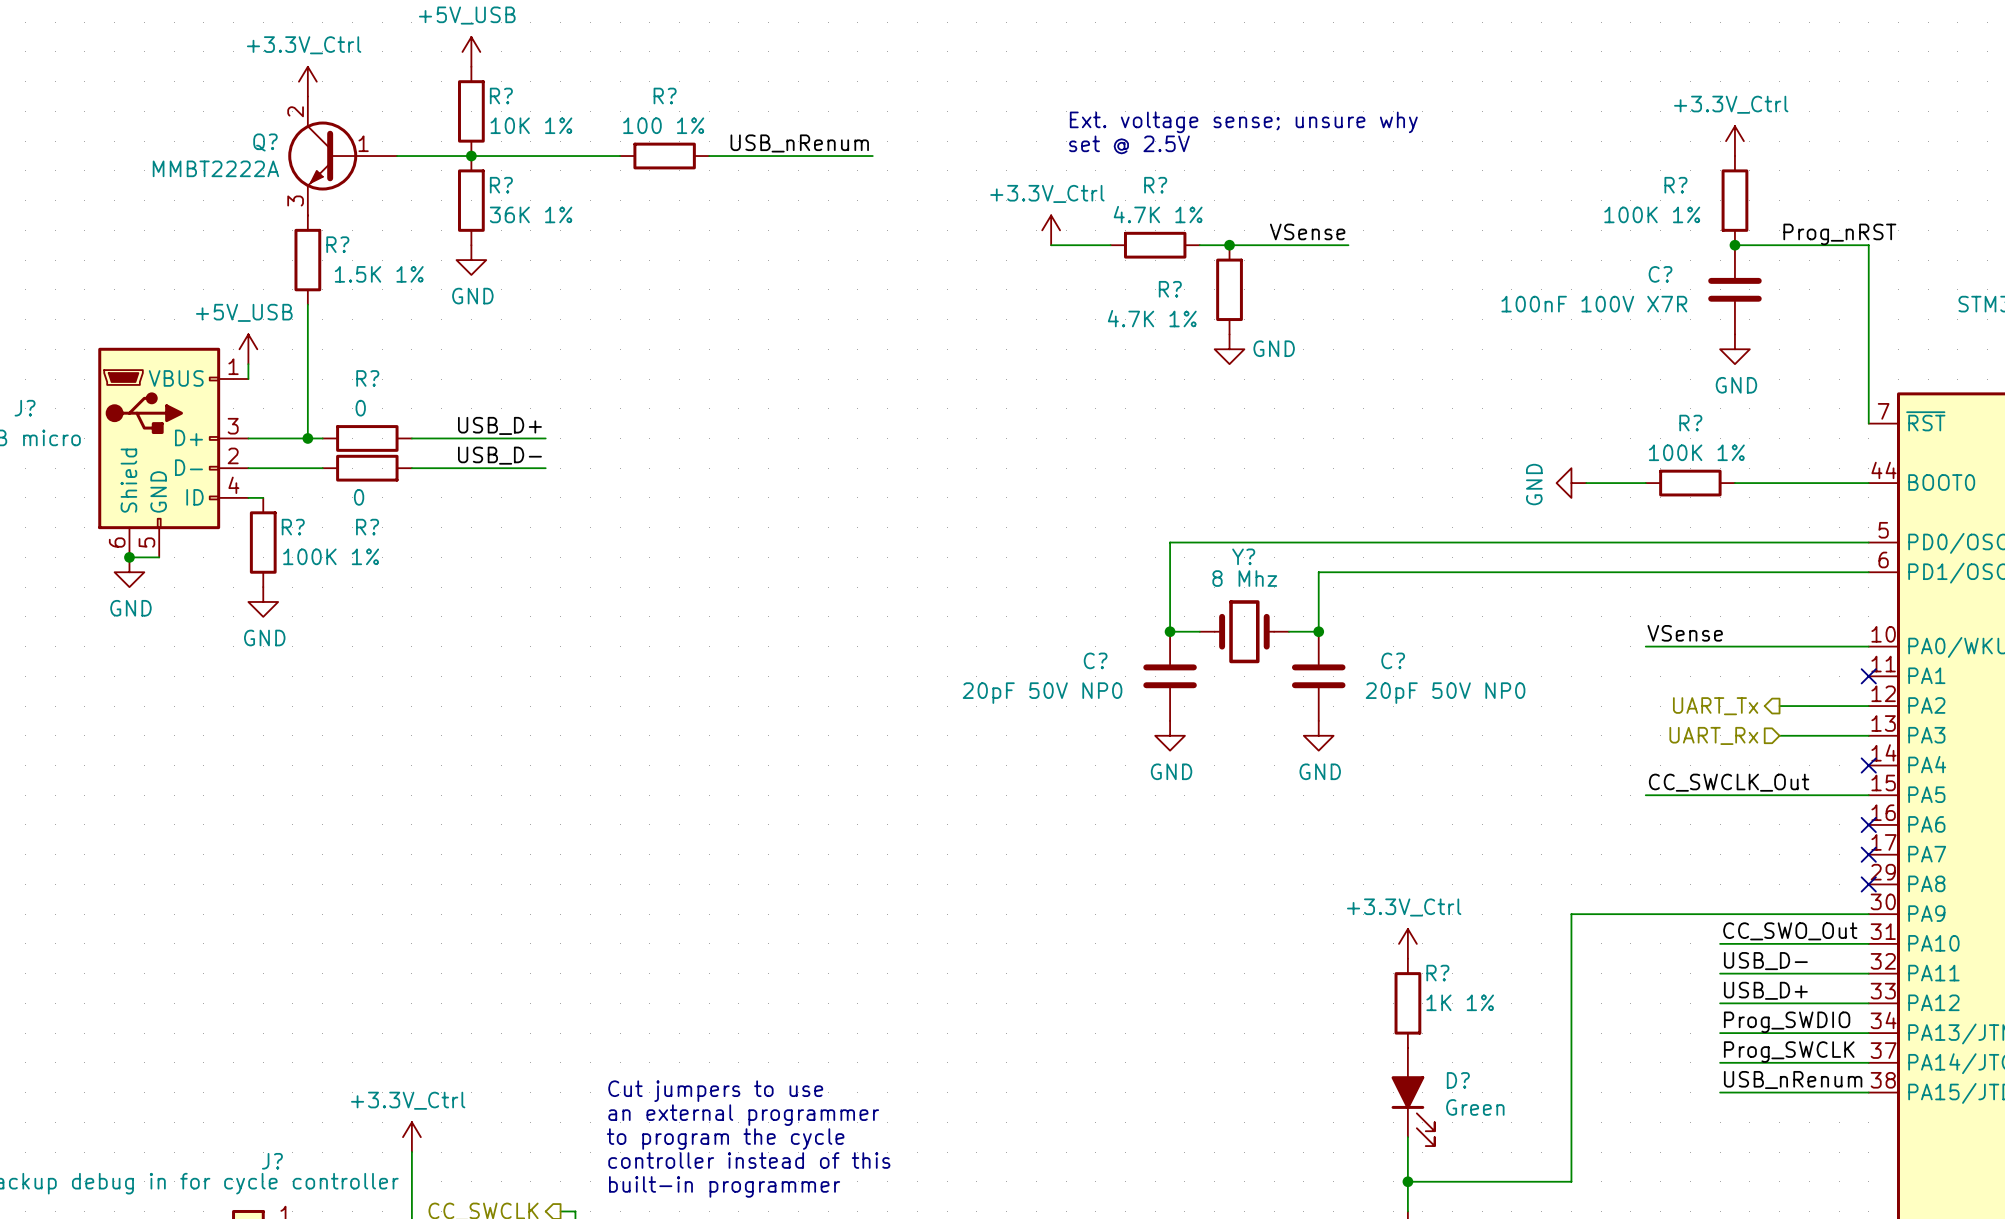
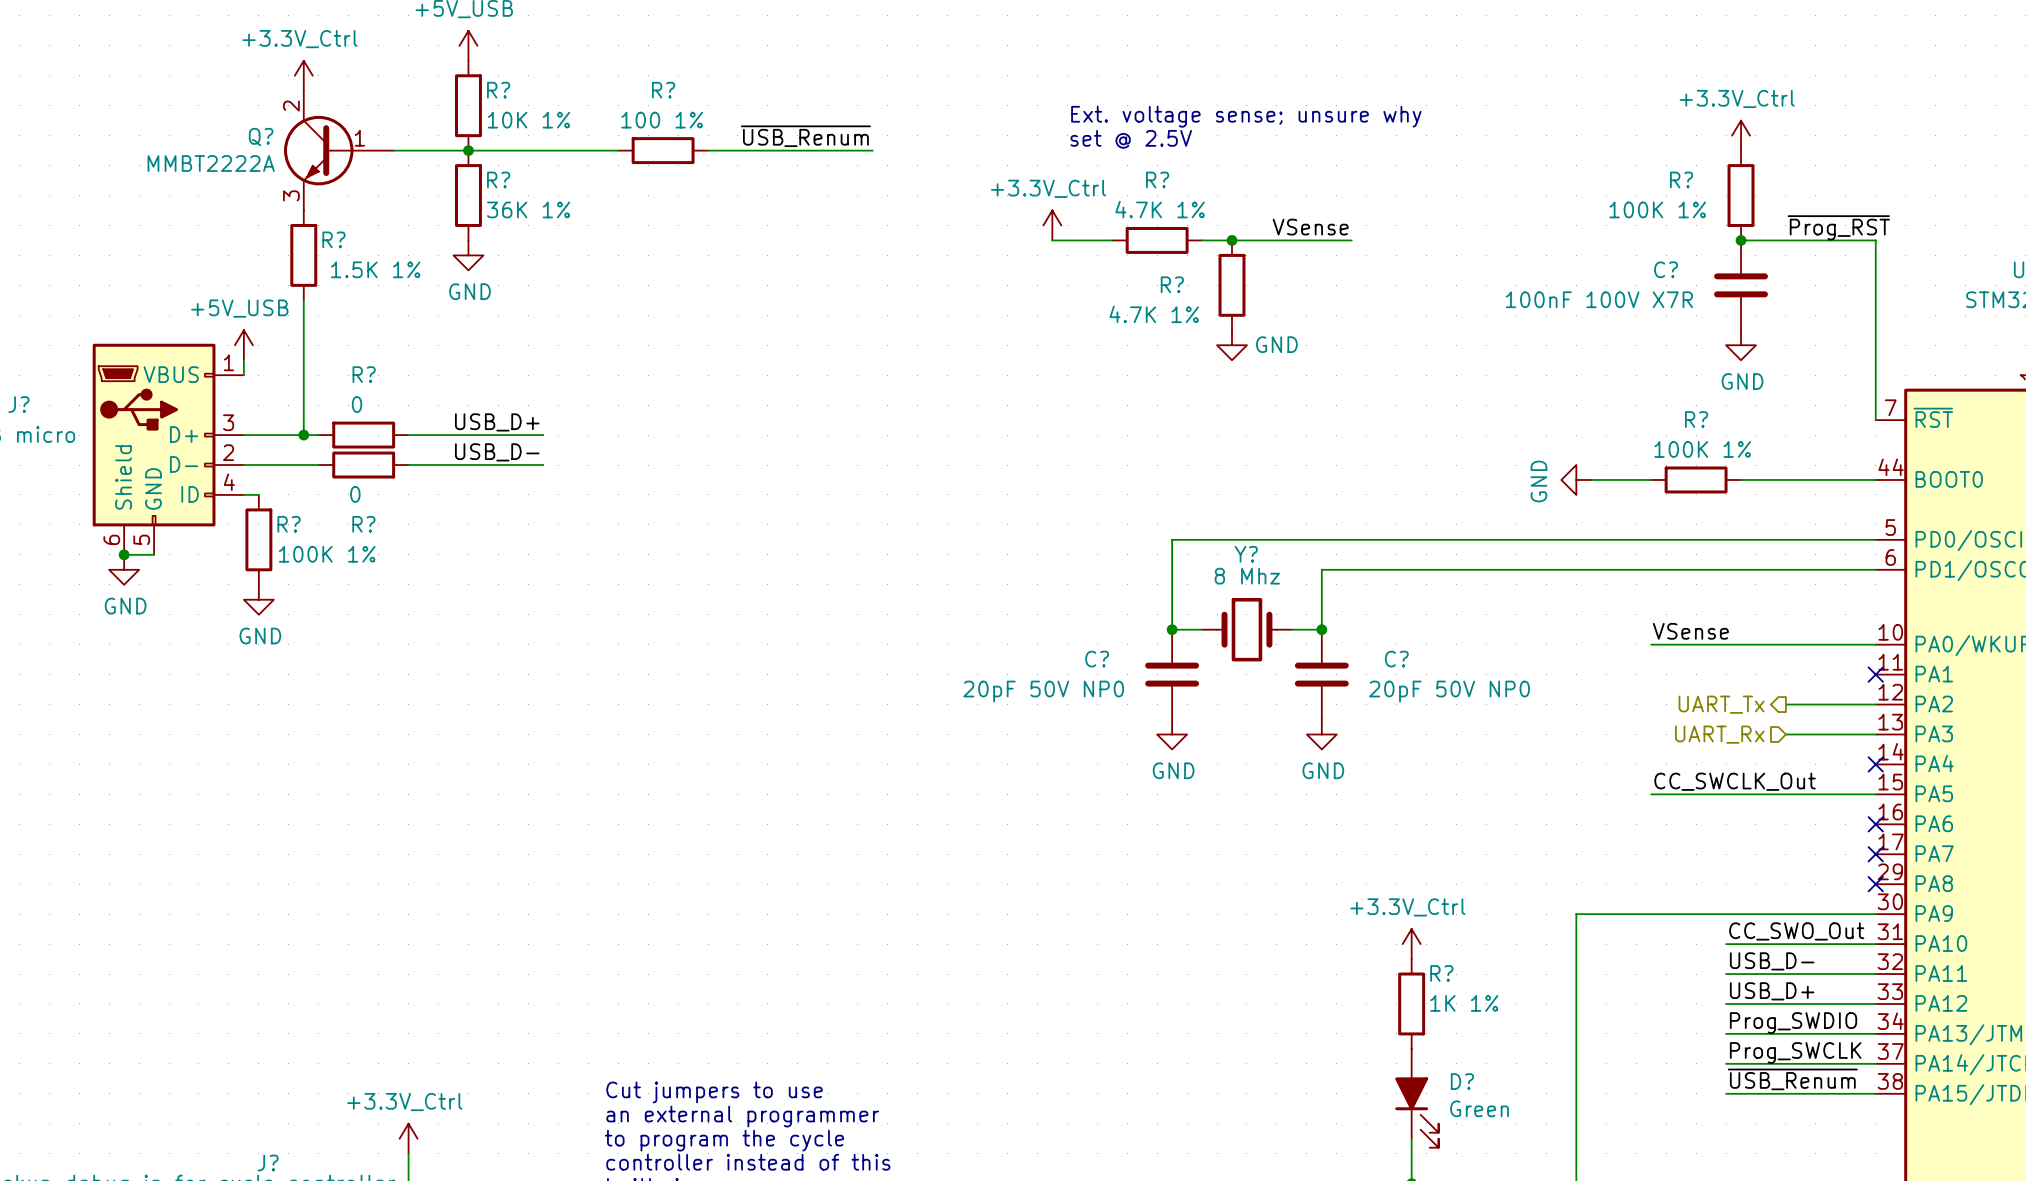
label: USB_nRenum (799, 143) -> ~{USB_Renum} (805, 136)
label: Prog_nRST (1839, 234) -> ~{Prog_RST} (1838, 227)
label: USB_nRenum (1793, 1079) -> ~{USB_Renum} (1792, 1079)

